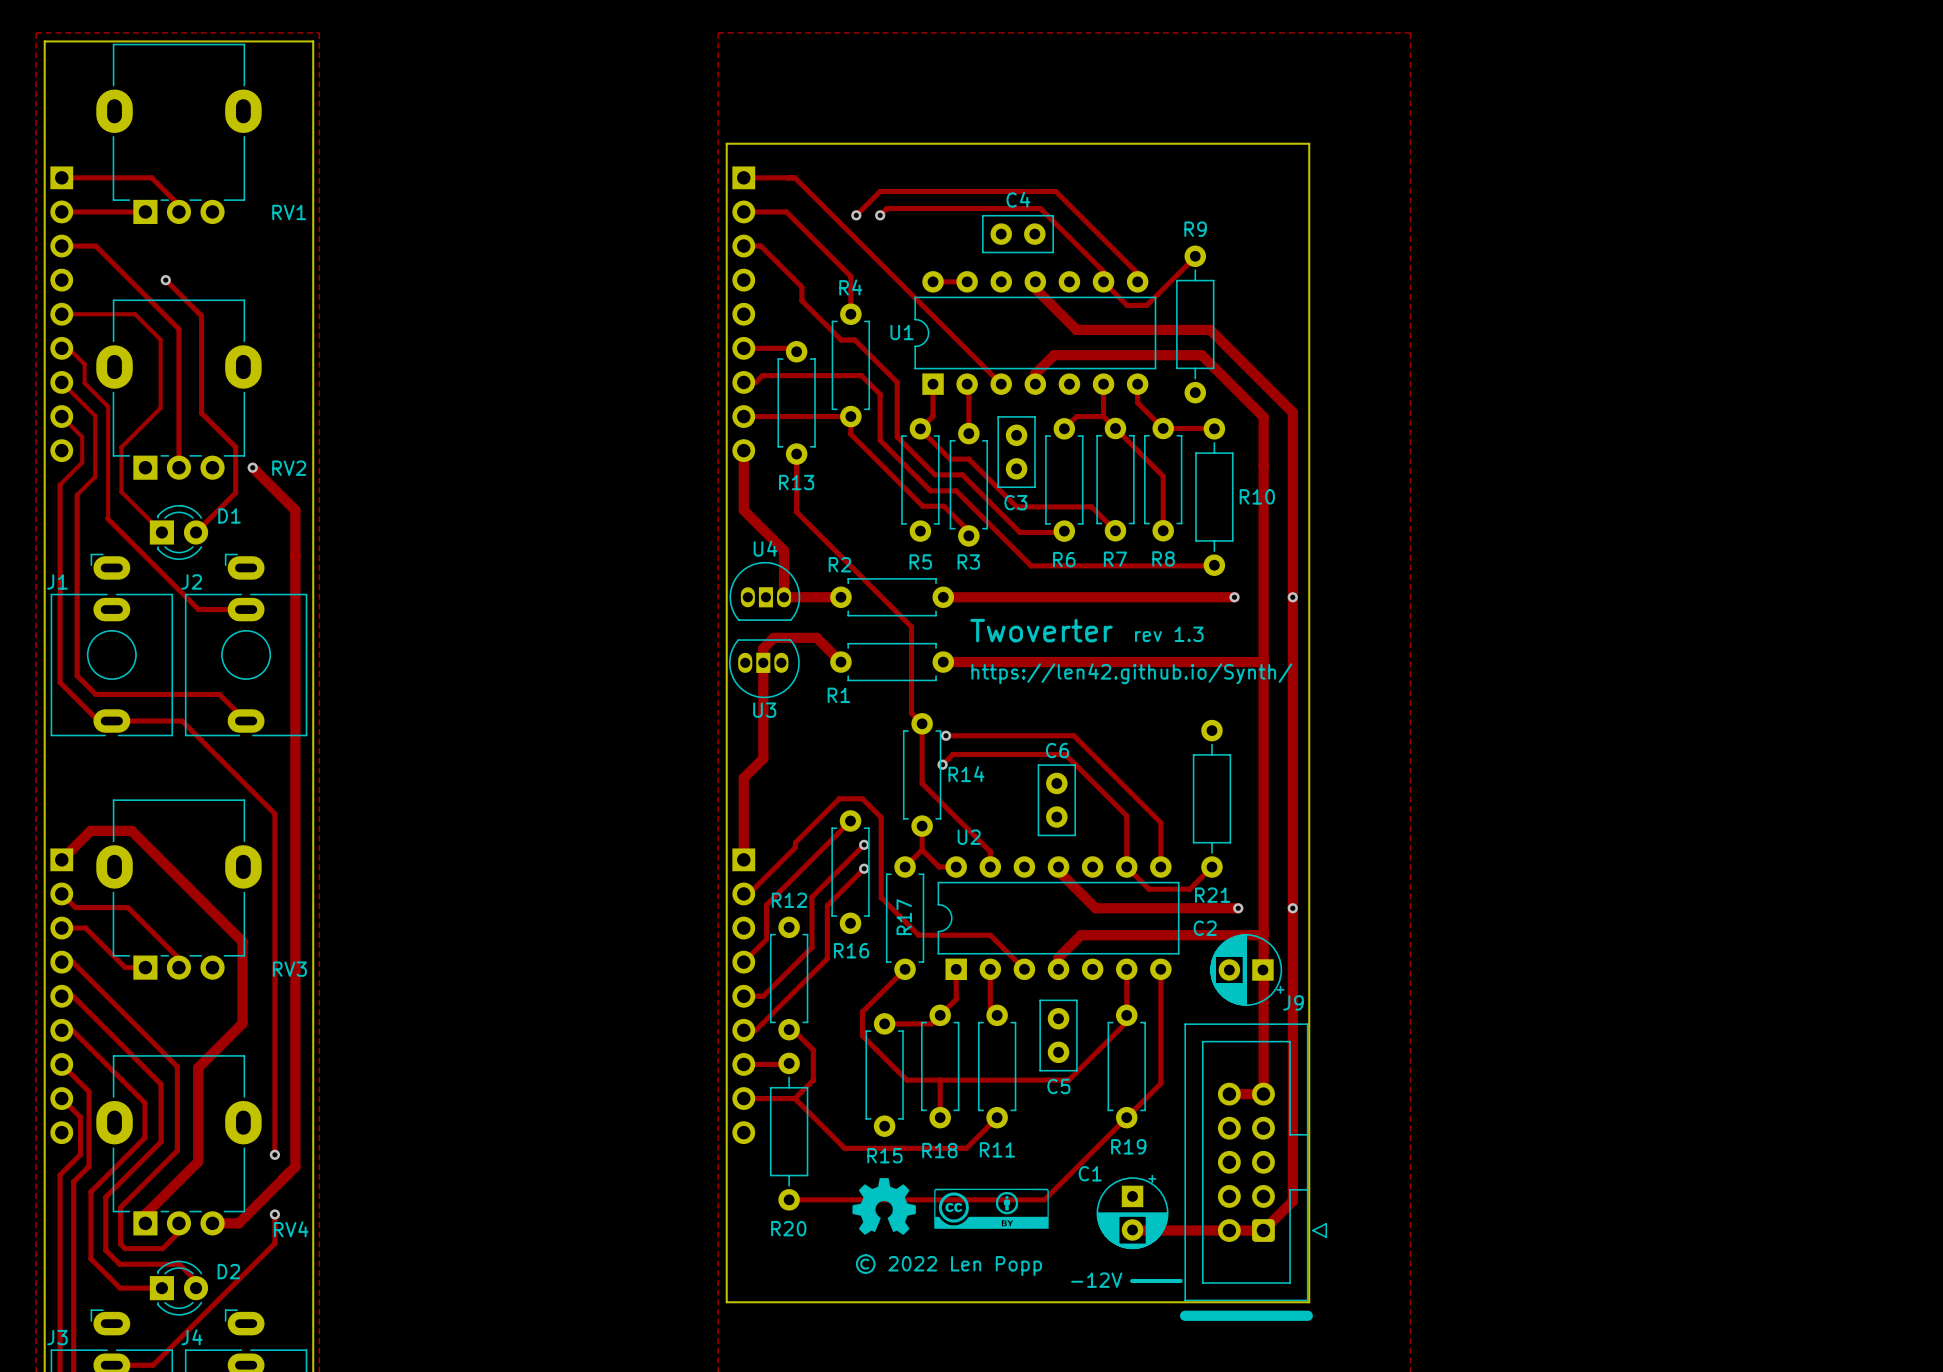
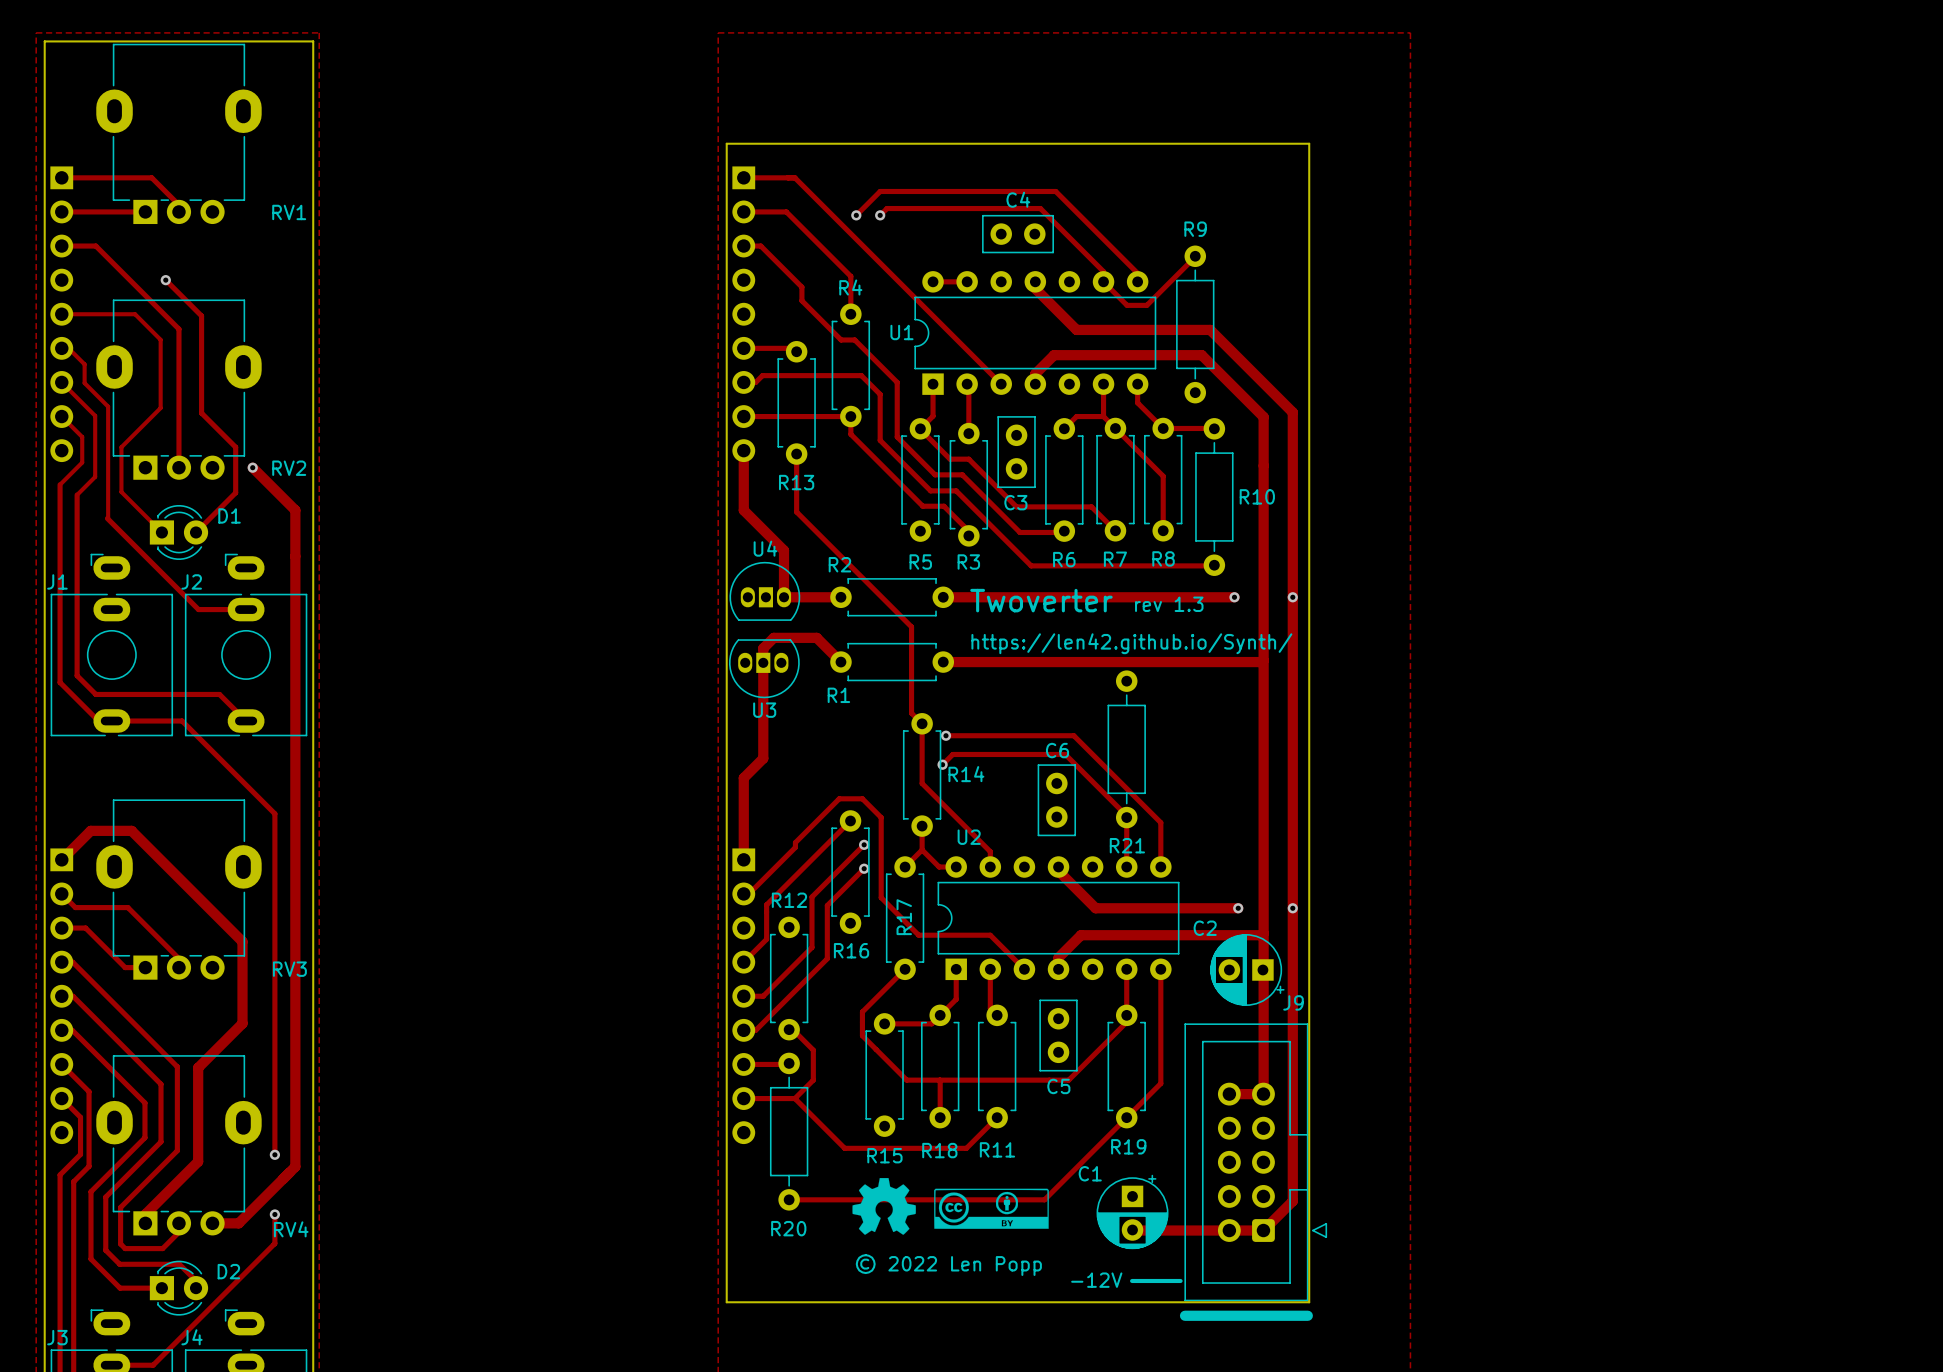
text: none -> Twoverter (1041, 600)
text: Twoverter (1041, 630) -> https://len42.github.io/Synth/ (1131, 643)
text position: rev 1.3 (1169, 634) -> rev 1.3 (1169, 604)
text: https://len42.github.io/Synth/ (1131, 673) -> none
R21 position: (1211, 798) -> (1126, 749)
track: (1126, 867) (1148, 889) (1189, 889) (1211, 867) -> none

